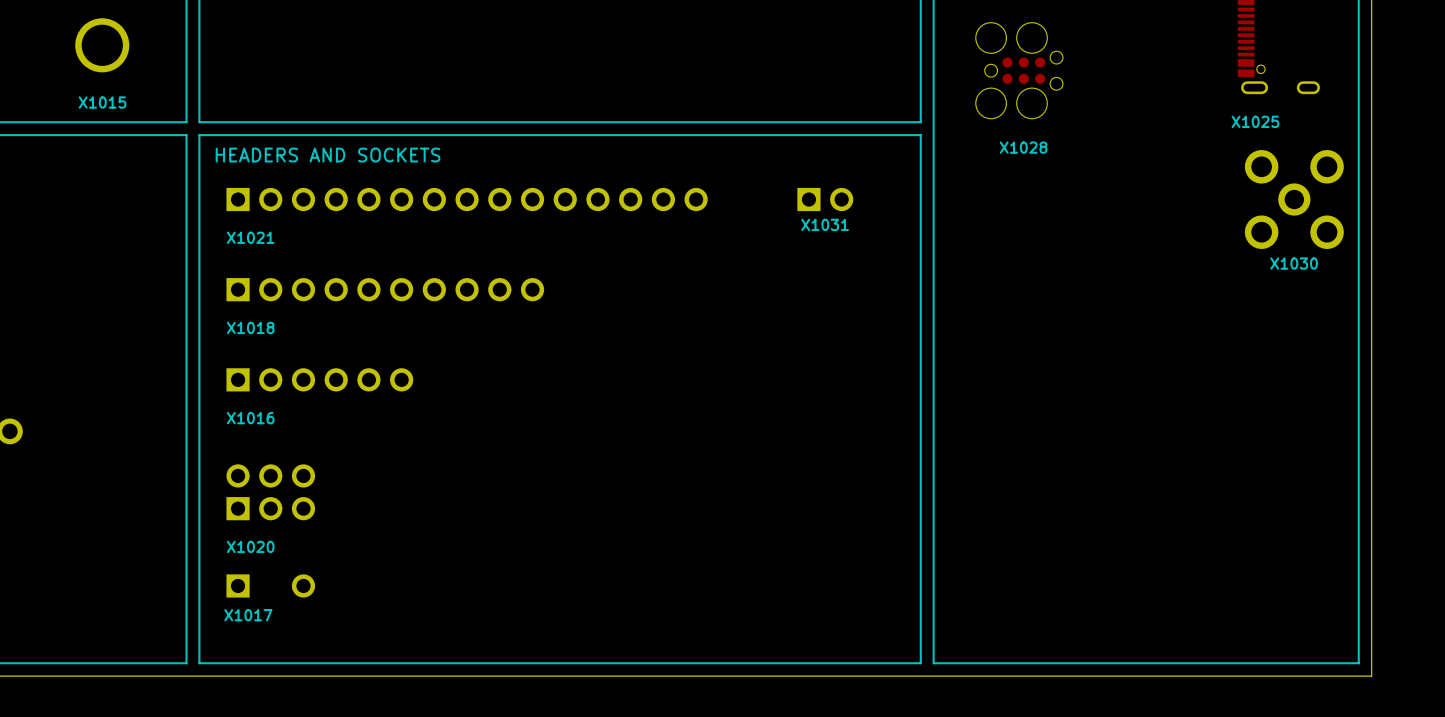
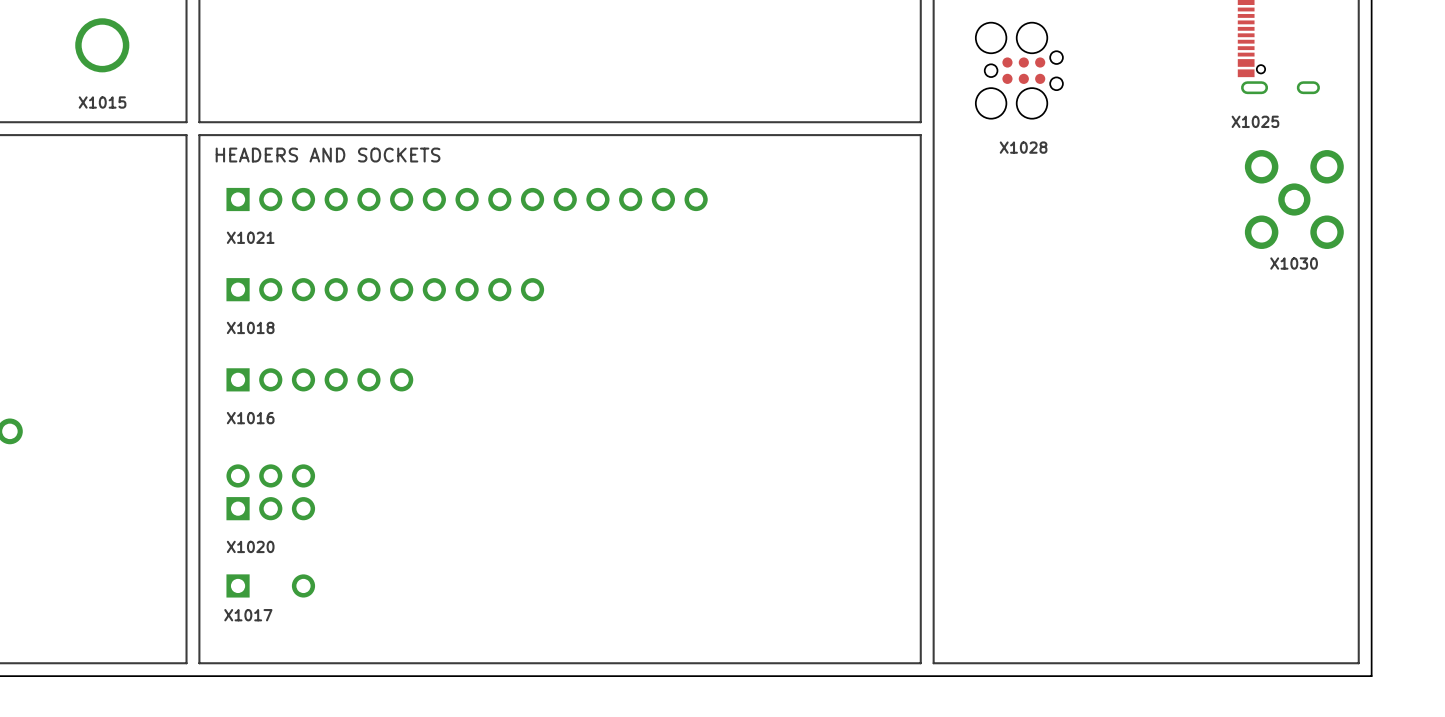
X1031: (825, 199) -> none

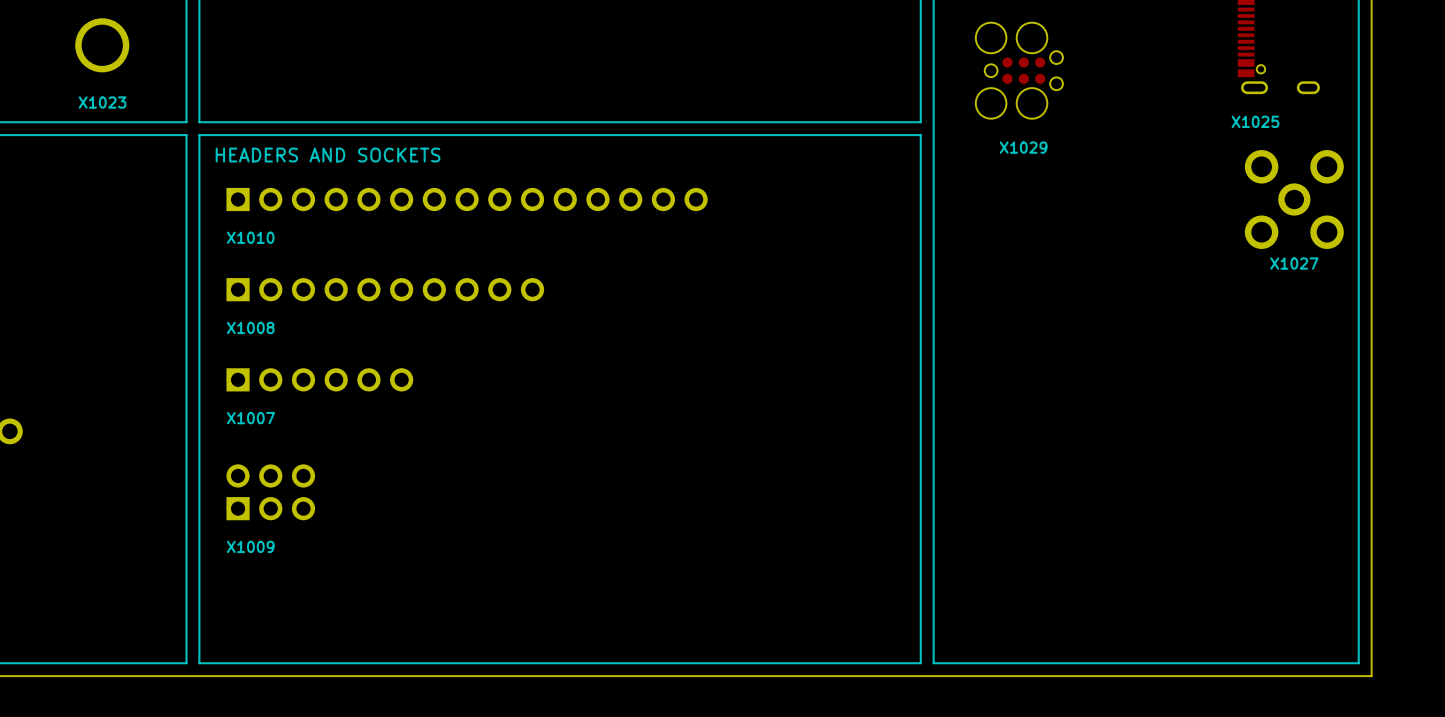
X1015 name: X1015 (102, 102) -> X1023 (102, 102)
X1028 name: X1028 (1023, 147) -> X1029 (1023, 147)
X1021 name: X1021 (250, 237) -> X1010 (250, 237)
X1030 name: X1030 (1294, 263) -> X1027 (1294, 263)
X1018 name: X1018 (250, 327) -> X1008 (250, 327)
X1016 name: X1016 (250, 418) -> X1007 (250, 418)
X1020 name: X1020 (250, 546) -> X1009 (250, 546)
X1017: (270, 585) -> none

